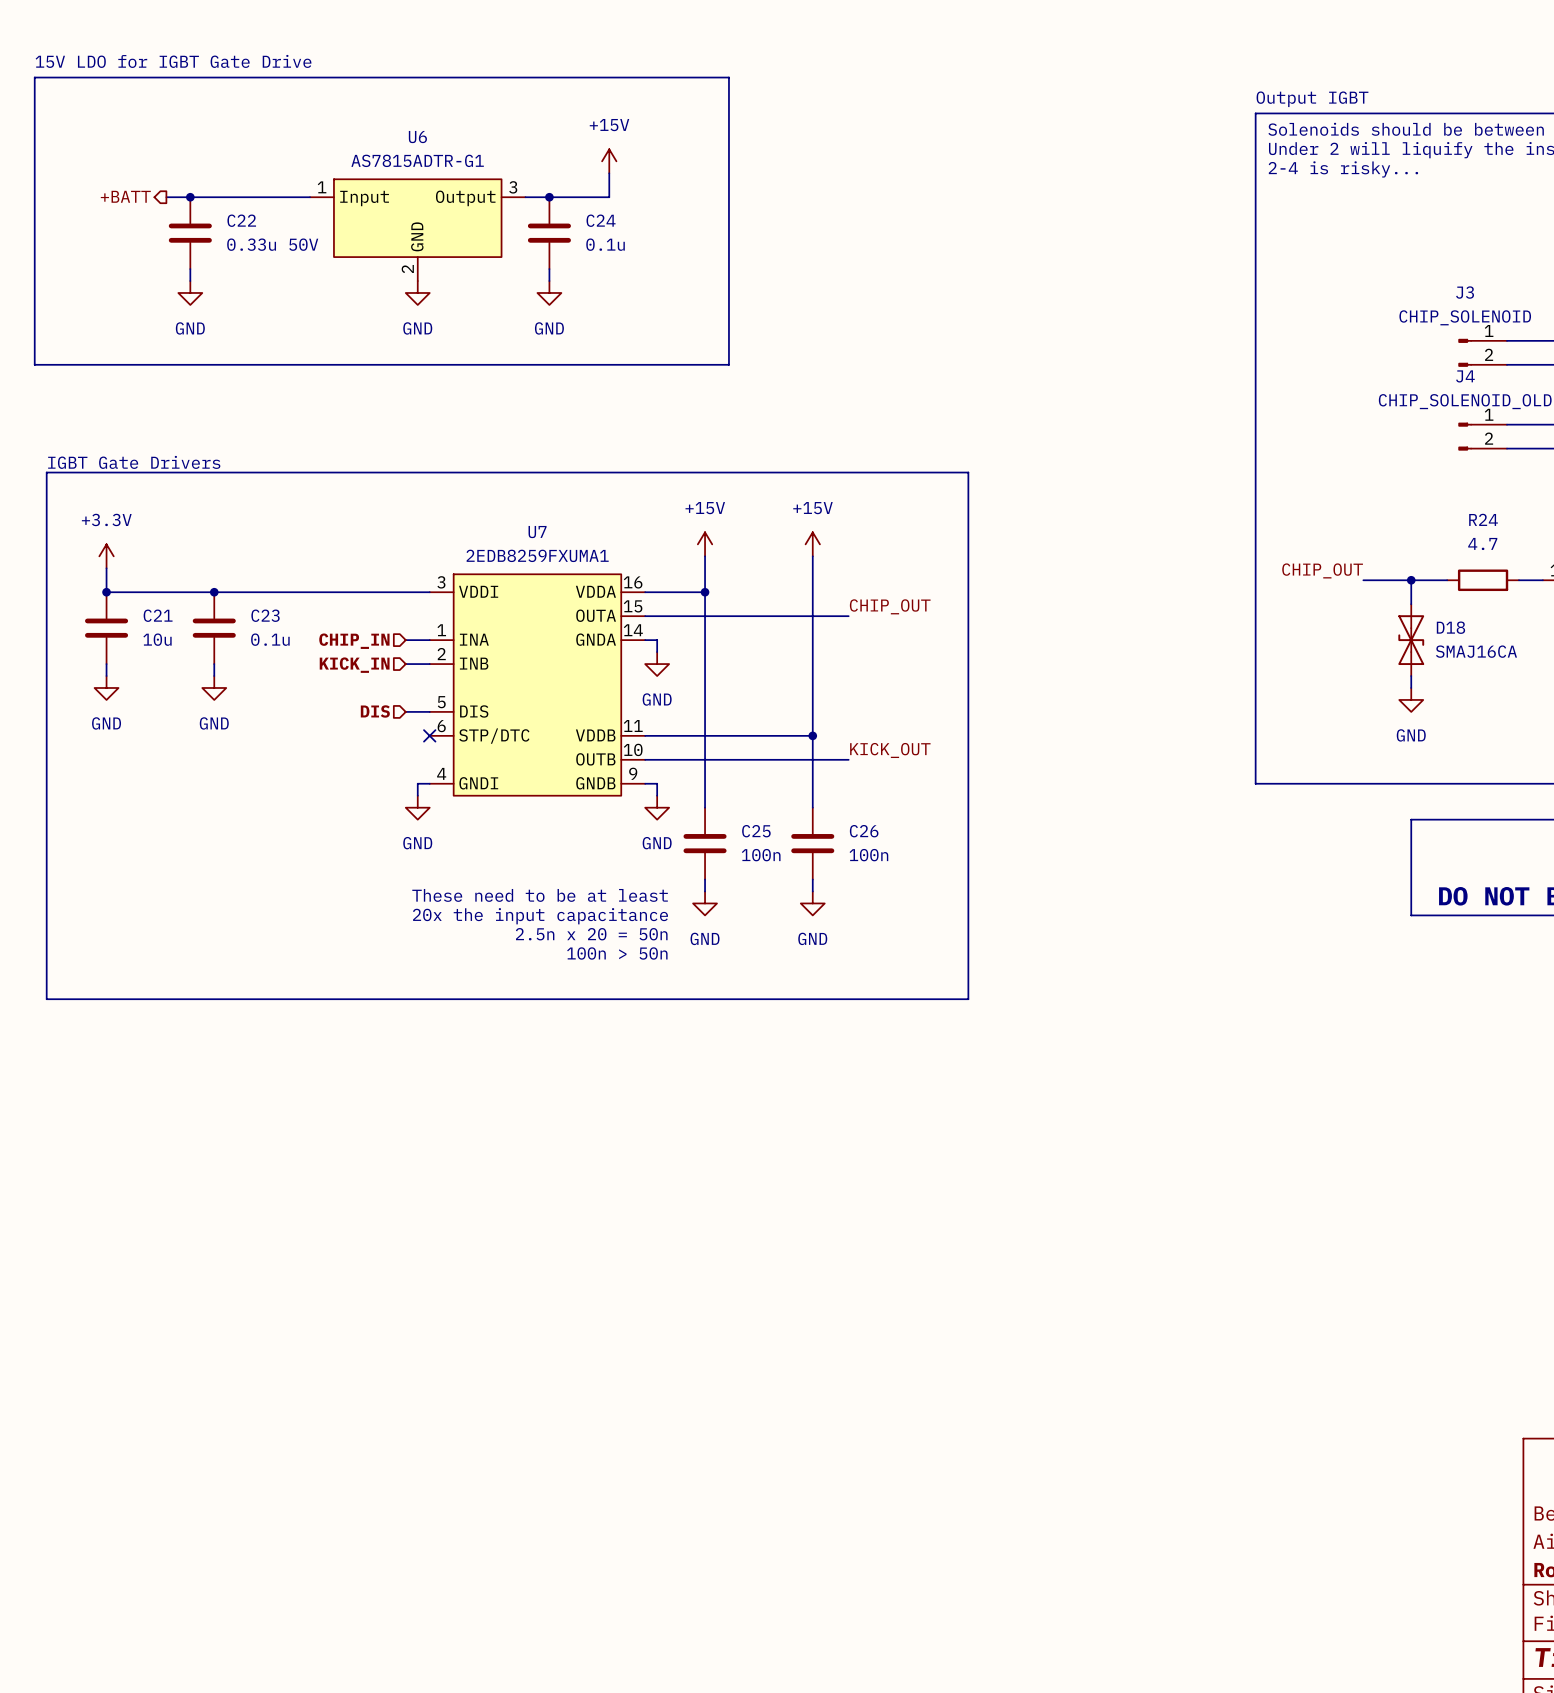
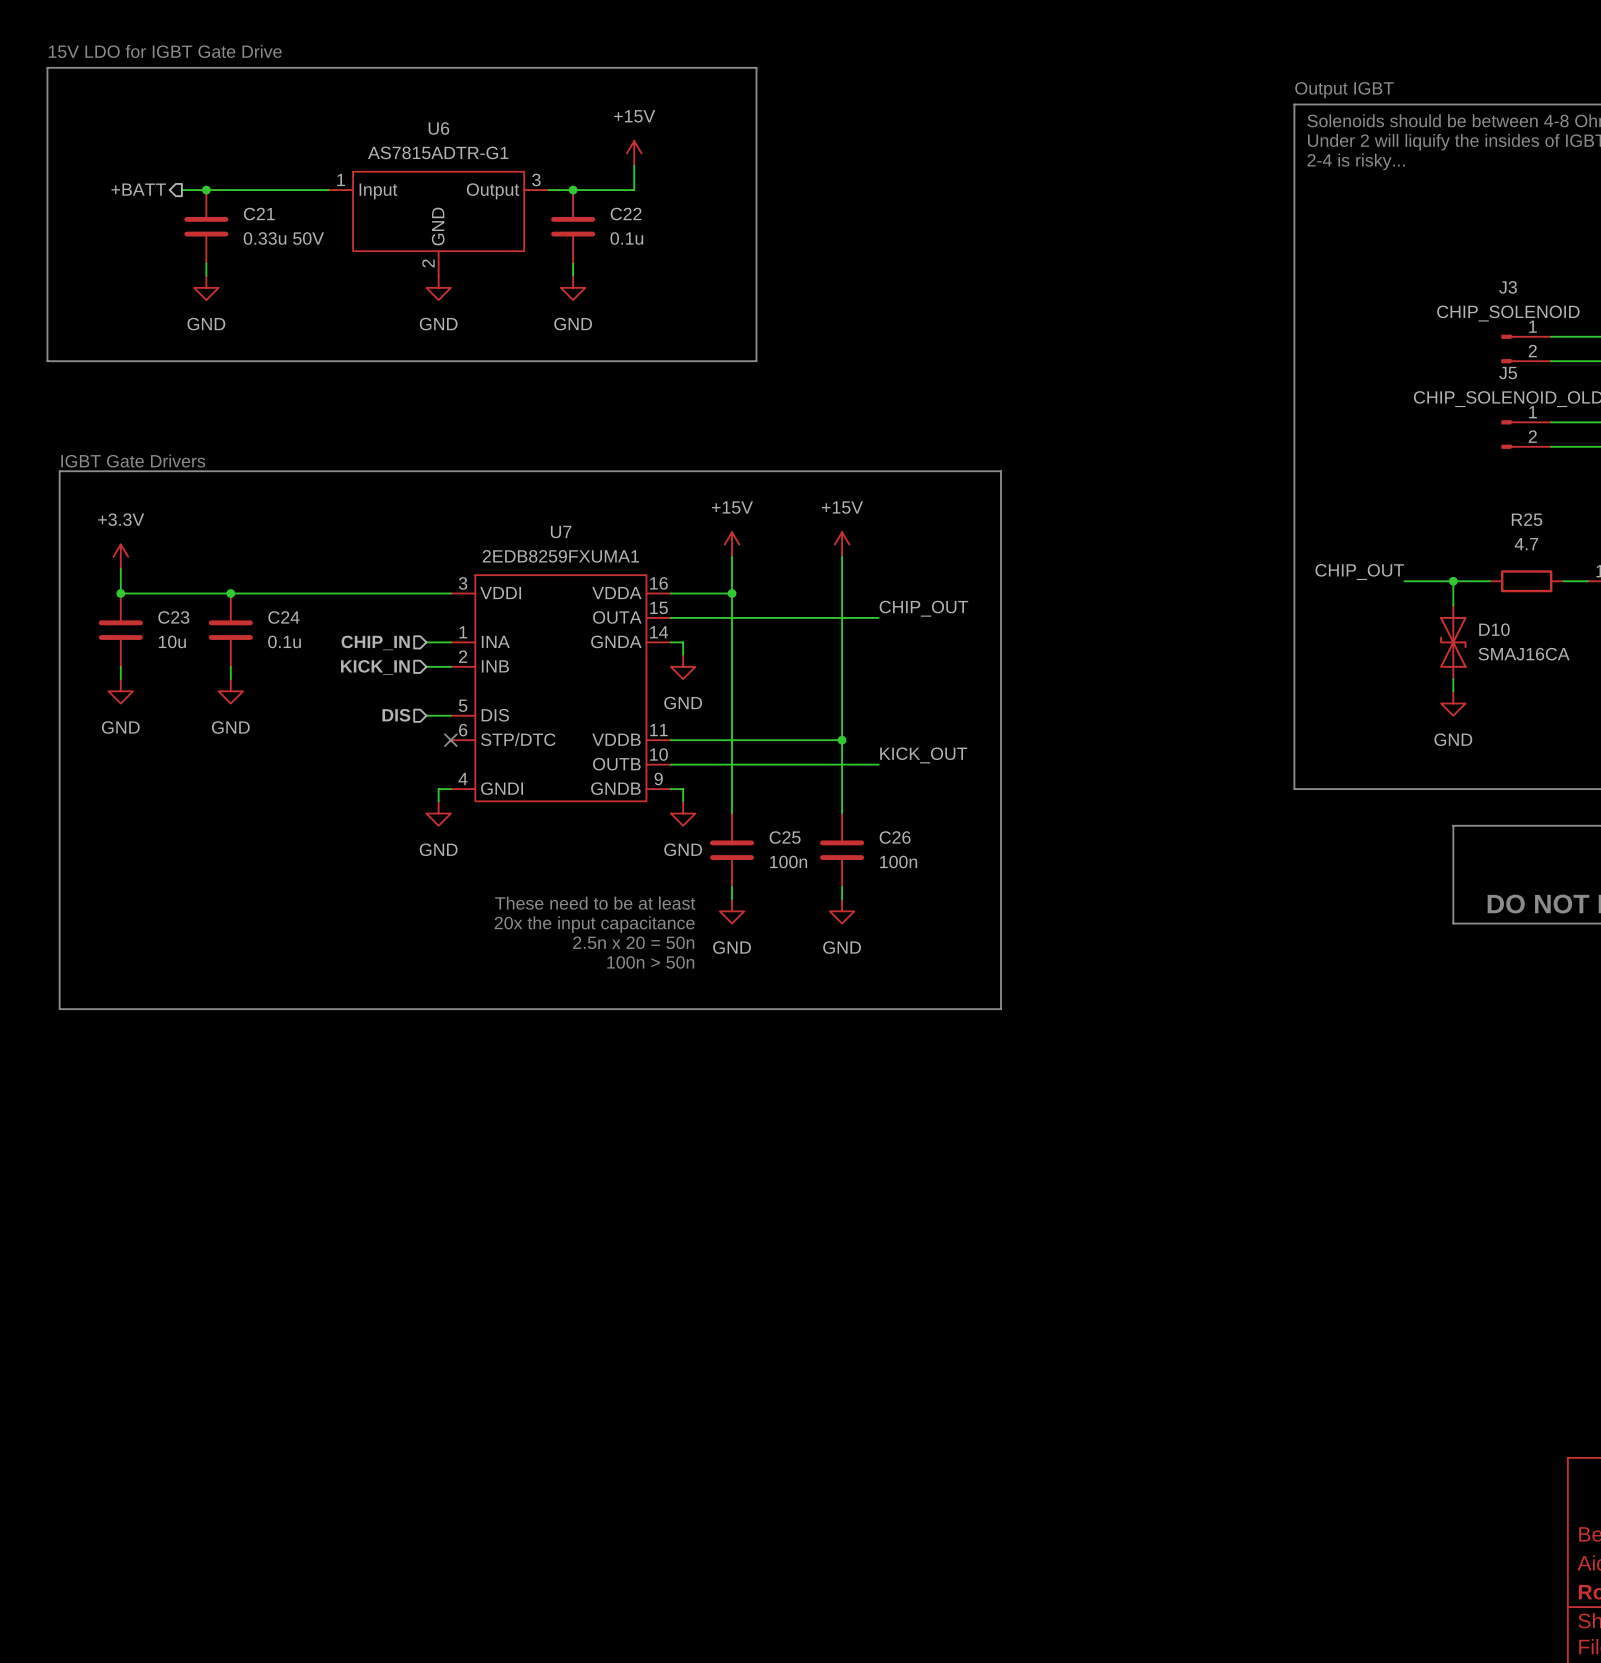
C22 name: C22 (241, 220) -> C21 (259, 214)
C24 name: C24 (601, 220) -> C22 (626, 214)
J4 name: J4 (1465, 376) -> J5 (1508, 373)
R24 name: R24 (1483, 519) -> R25 (1527, 519)
C21 name: C21 (158, 615) -> C23 (173, 617)
C23 name: C23 (265, 615) -> C24 (283, 617)
D18 name: D18 (1450, 627) -> D10 (1494, 629)

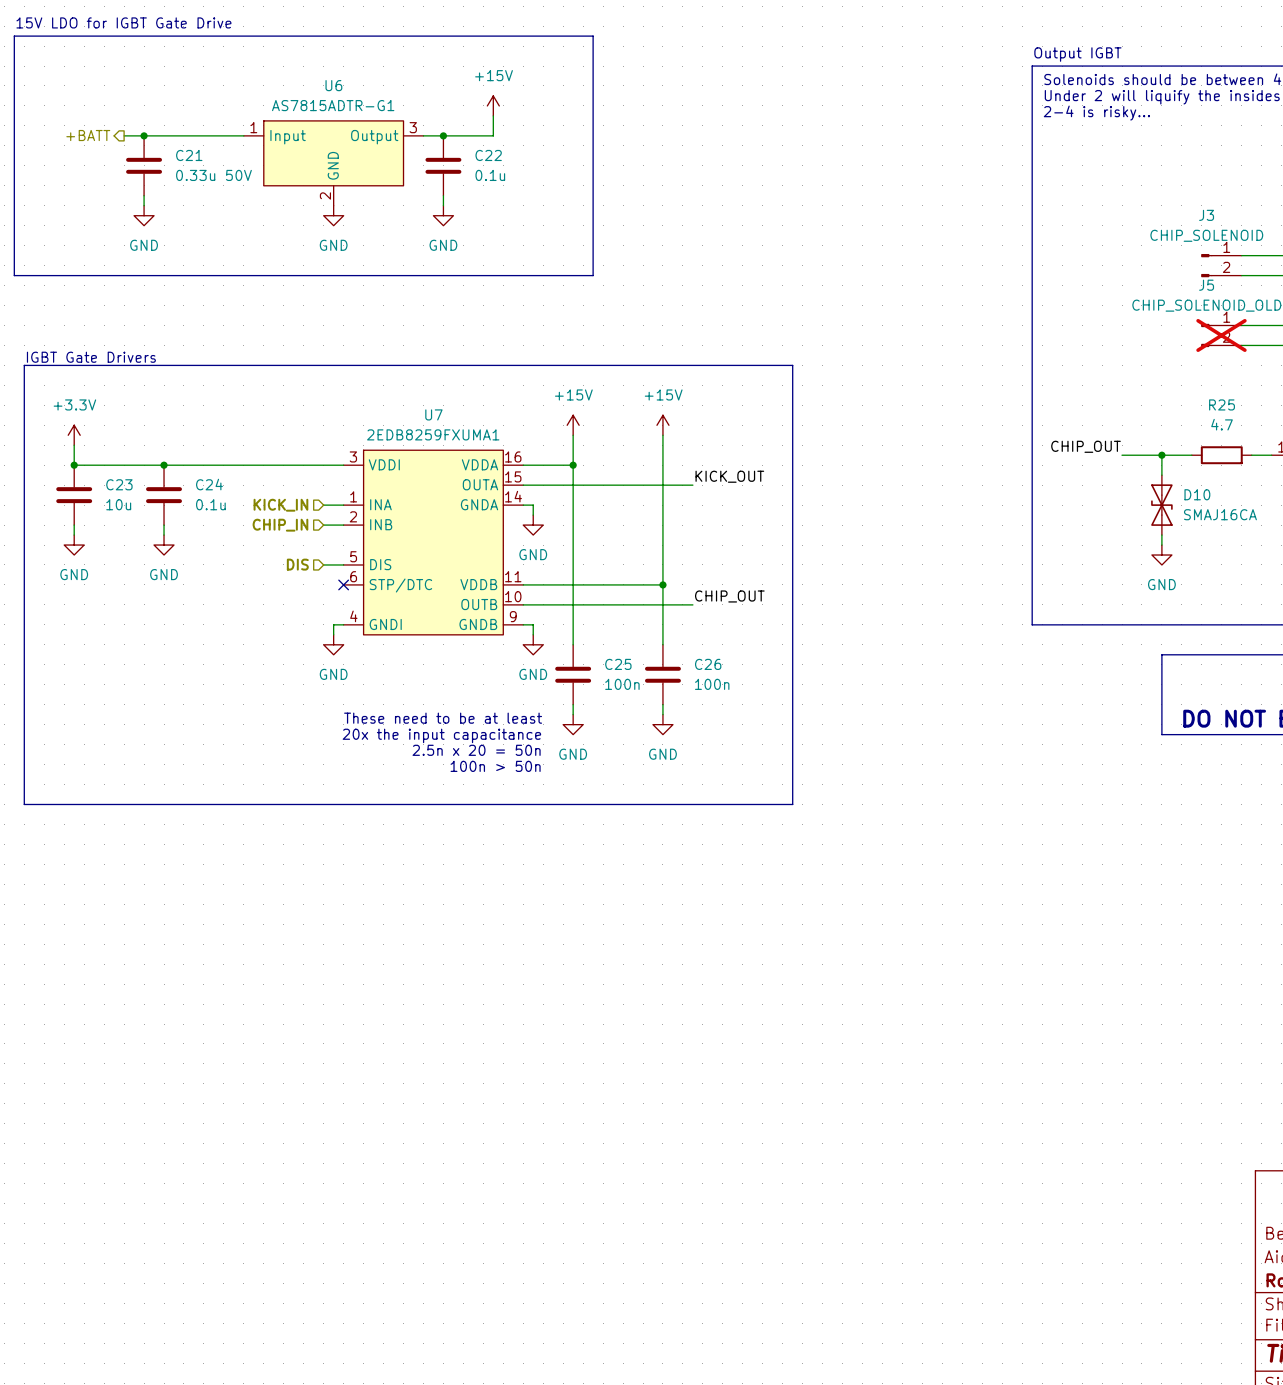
J5 do-not-place cross: none -> (1221, 335)
label: CHIP_OUT (923, 608) -> KICK_OUT (729, 476)
hierarchical label: CHIP_IN (375, 642) -> KICK_IN (280, 505)
hierarchical label: KICK_IN (375, 667) -> CHIP_IN (280, 525)
label: KICK_OUT (923, 755) -> CHIP_OUT (729, 596)

